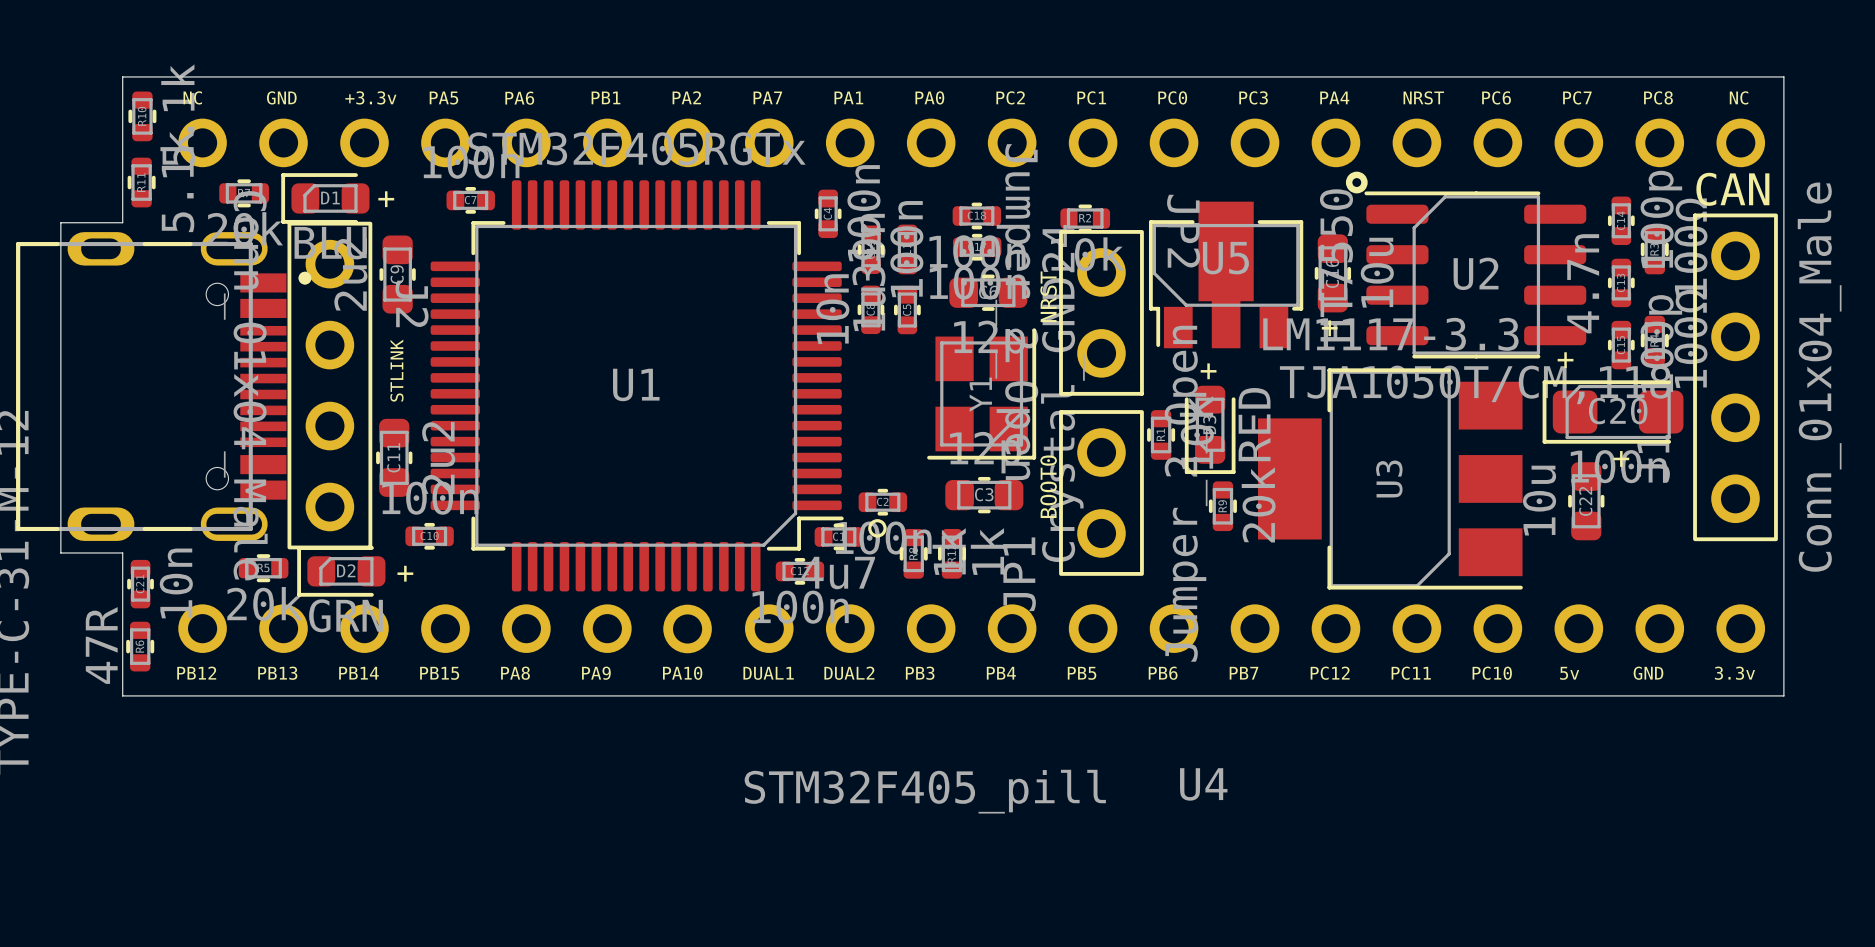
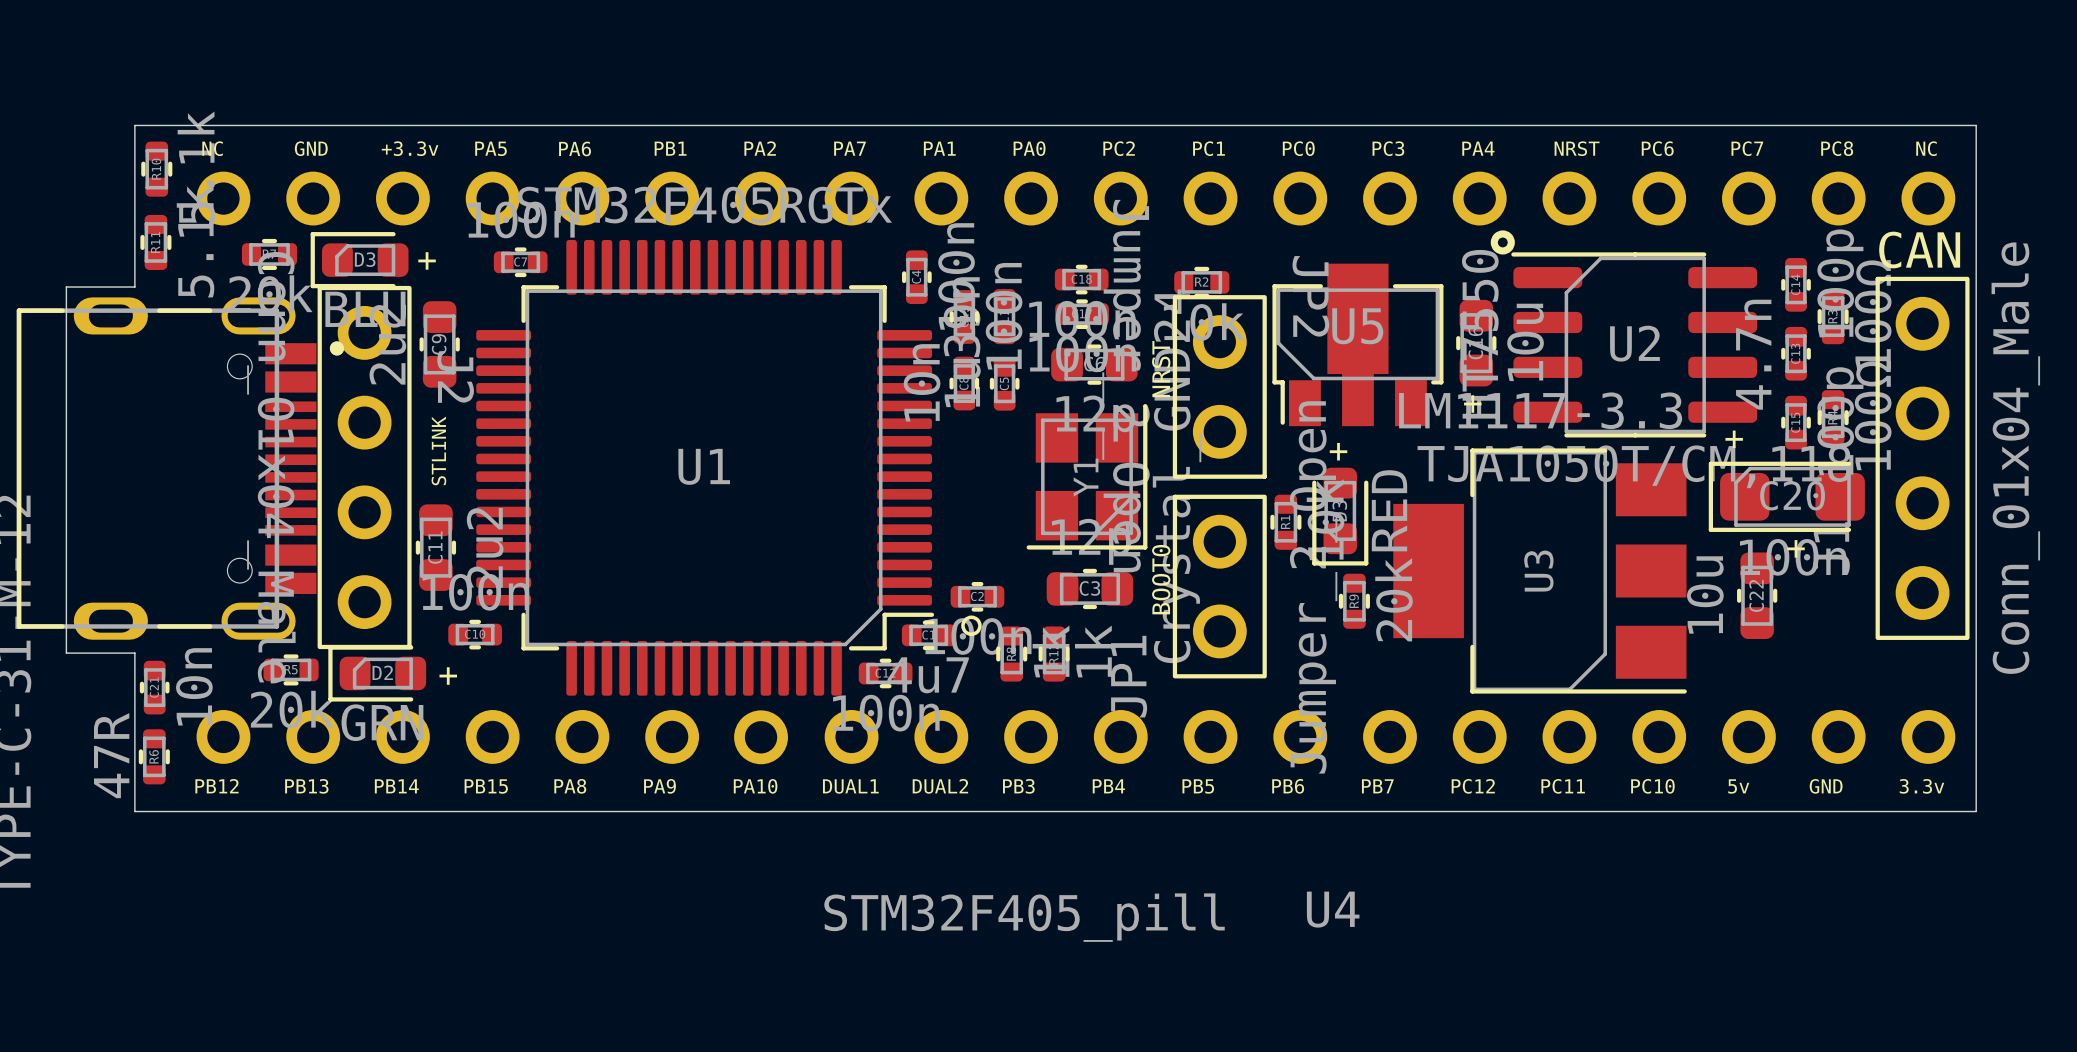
D1 name: D1 (330, 197) -> D3 (365, 259)

